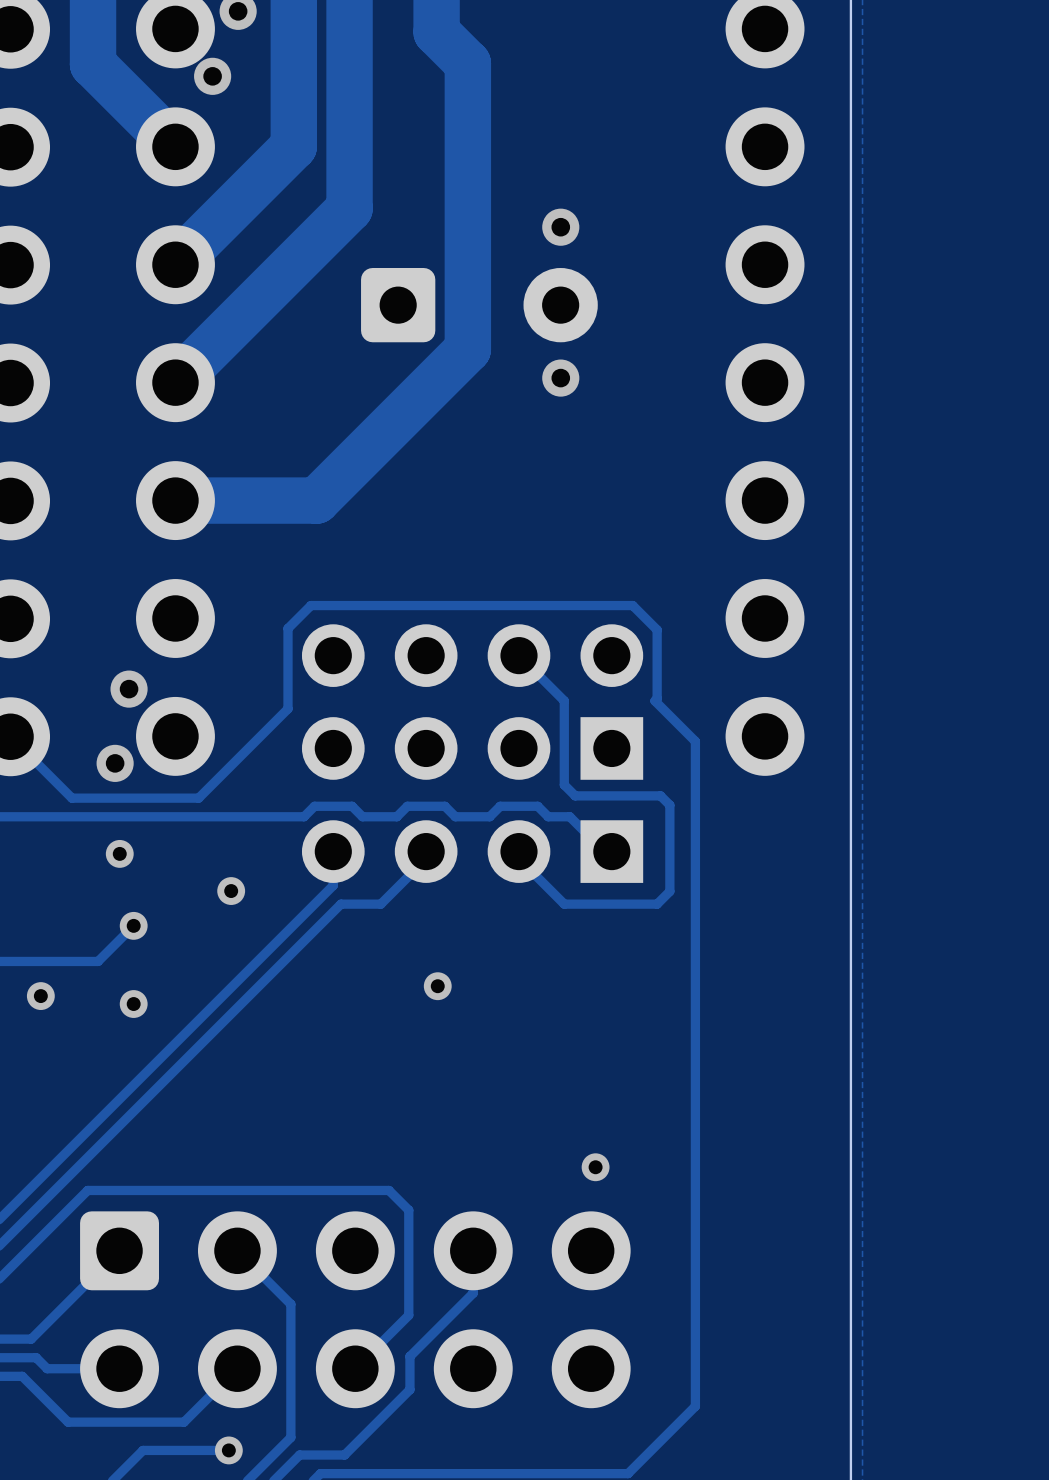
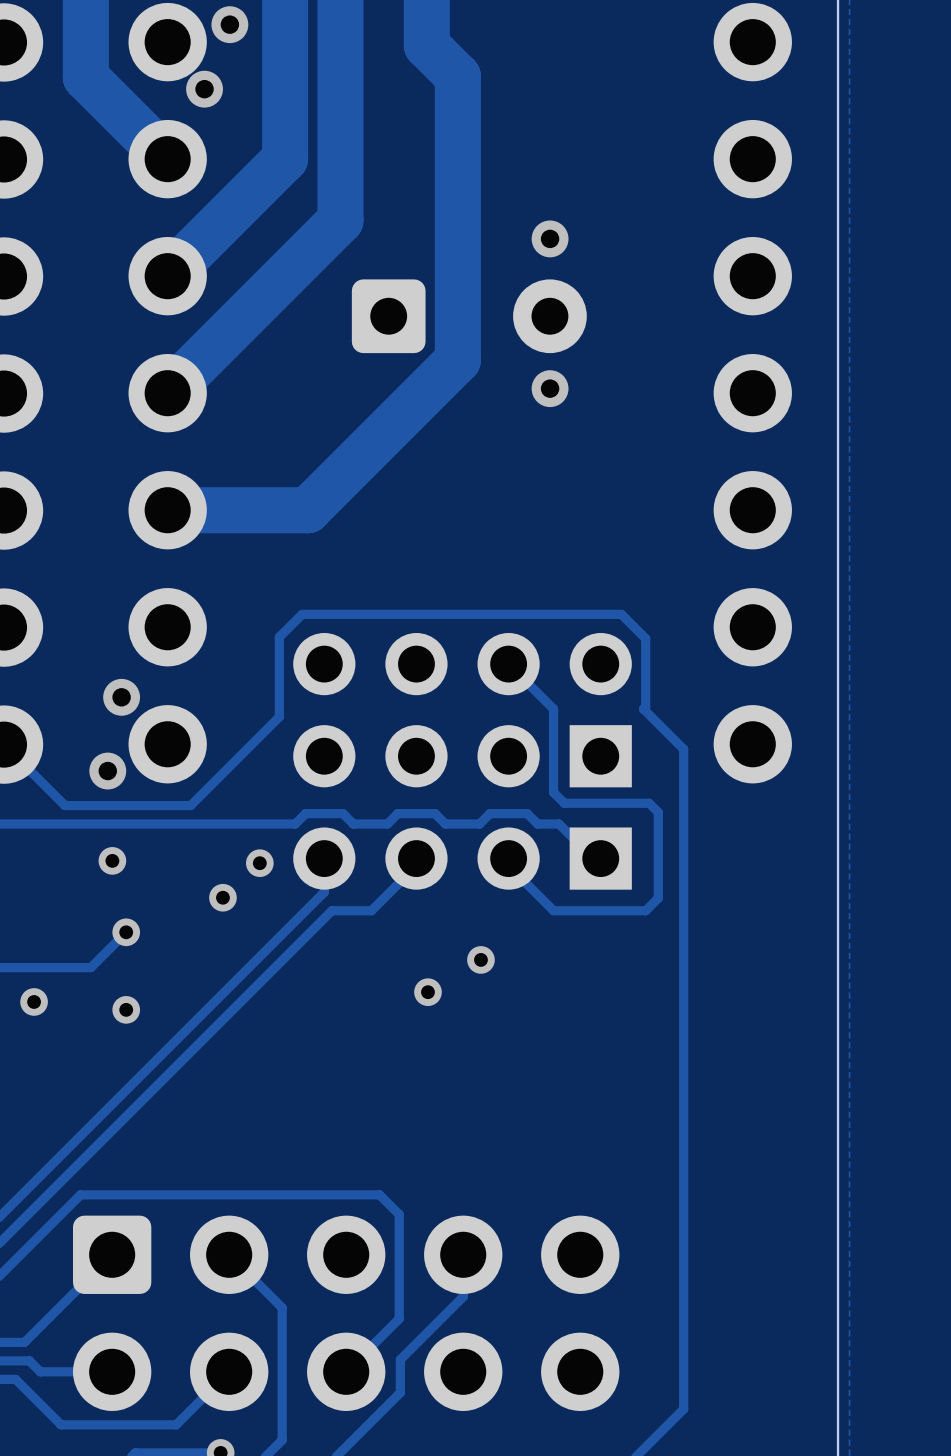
via: none -> (259, 863)
via: none -> (480, 959)
via: (595, 1167) -> none

